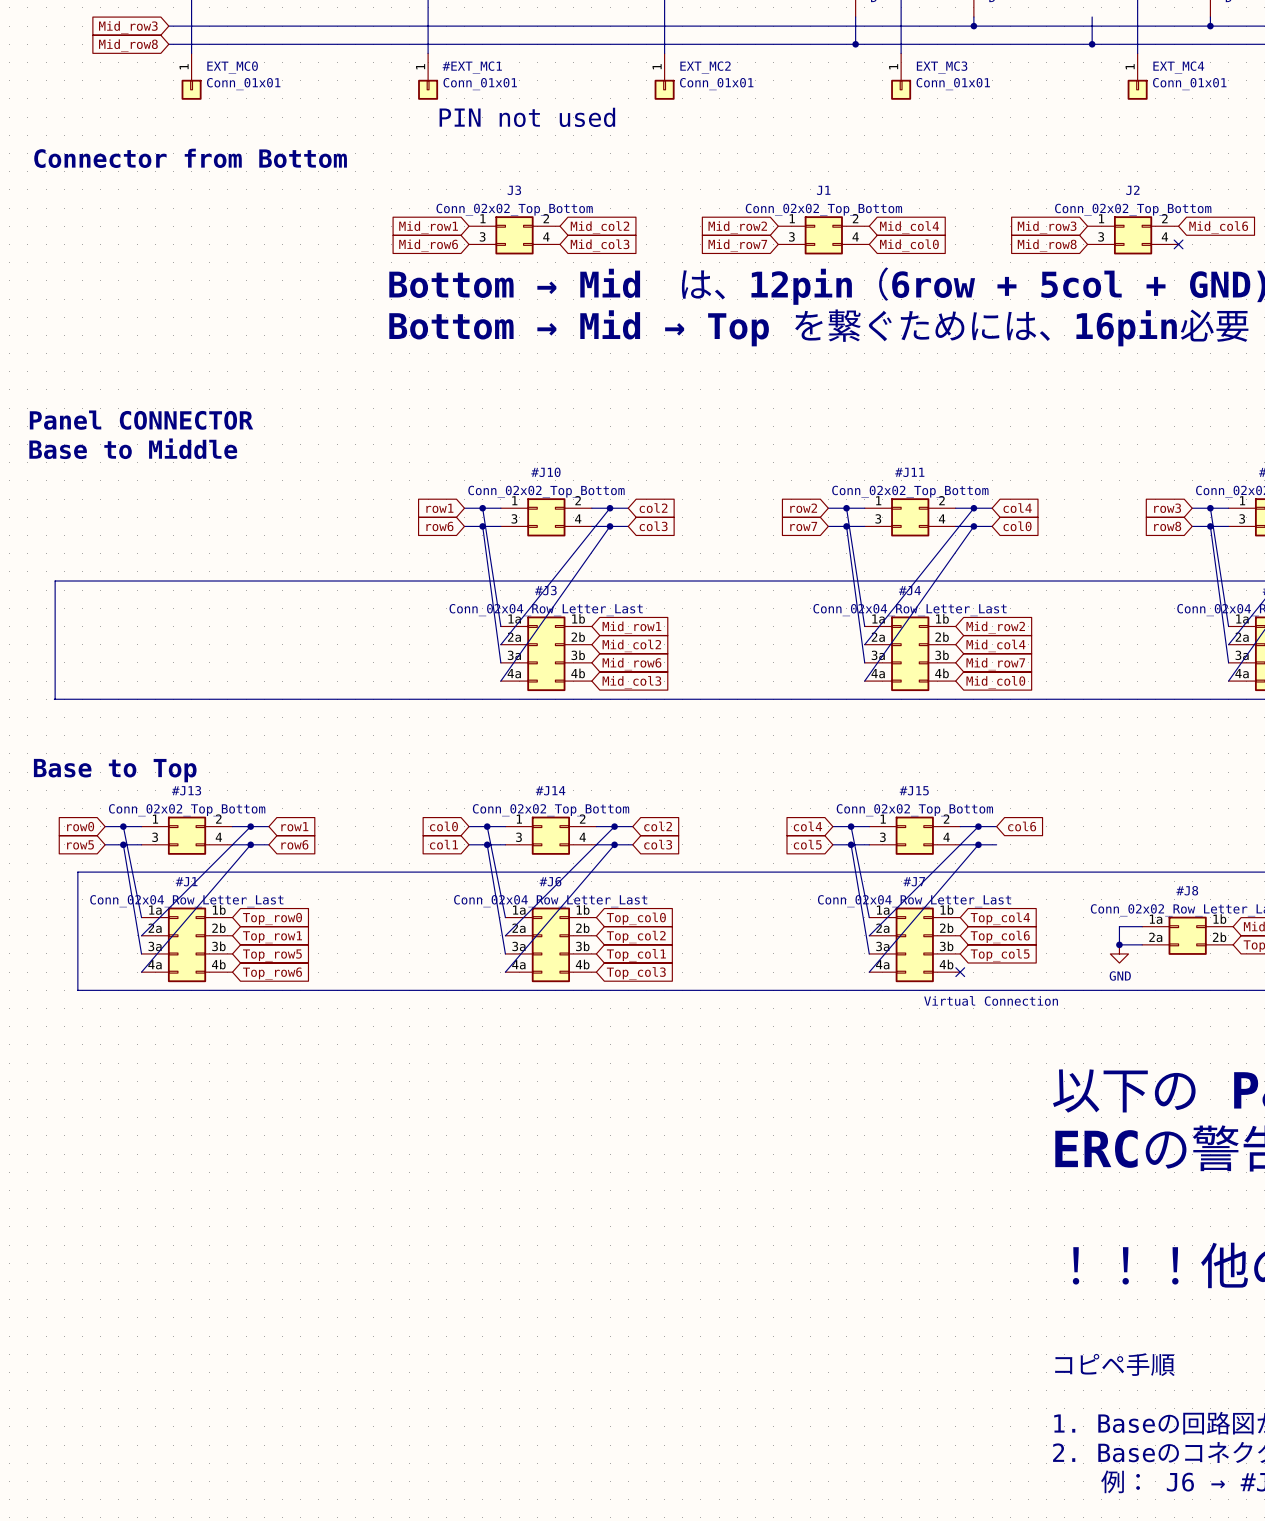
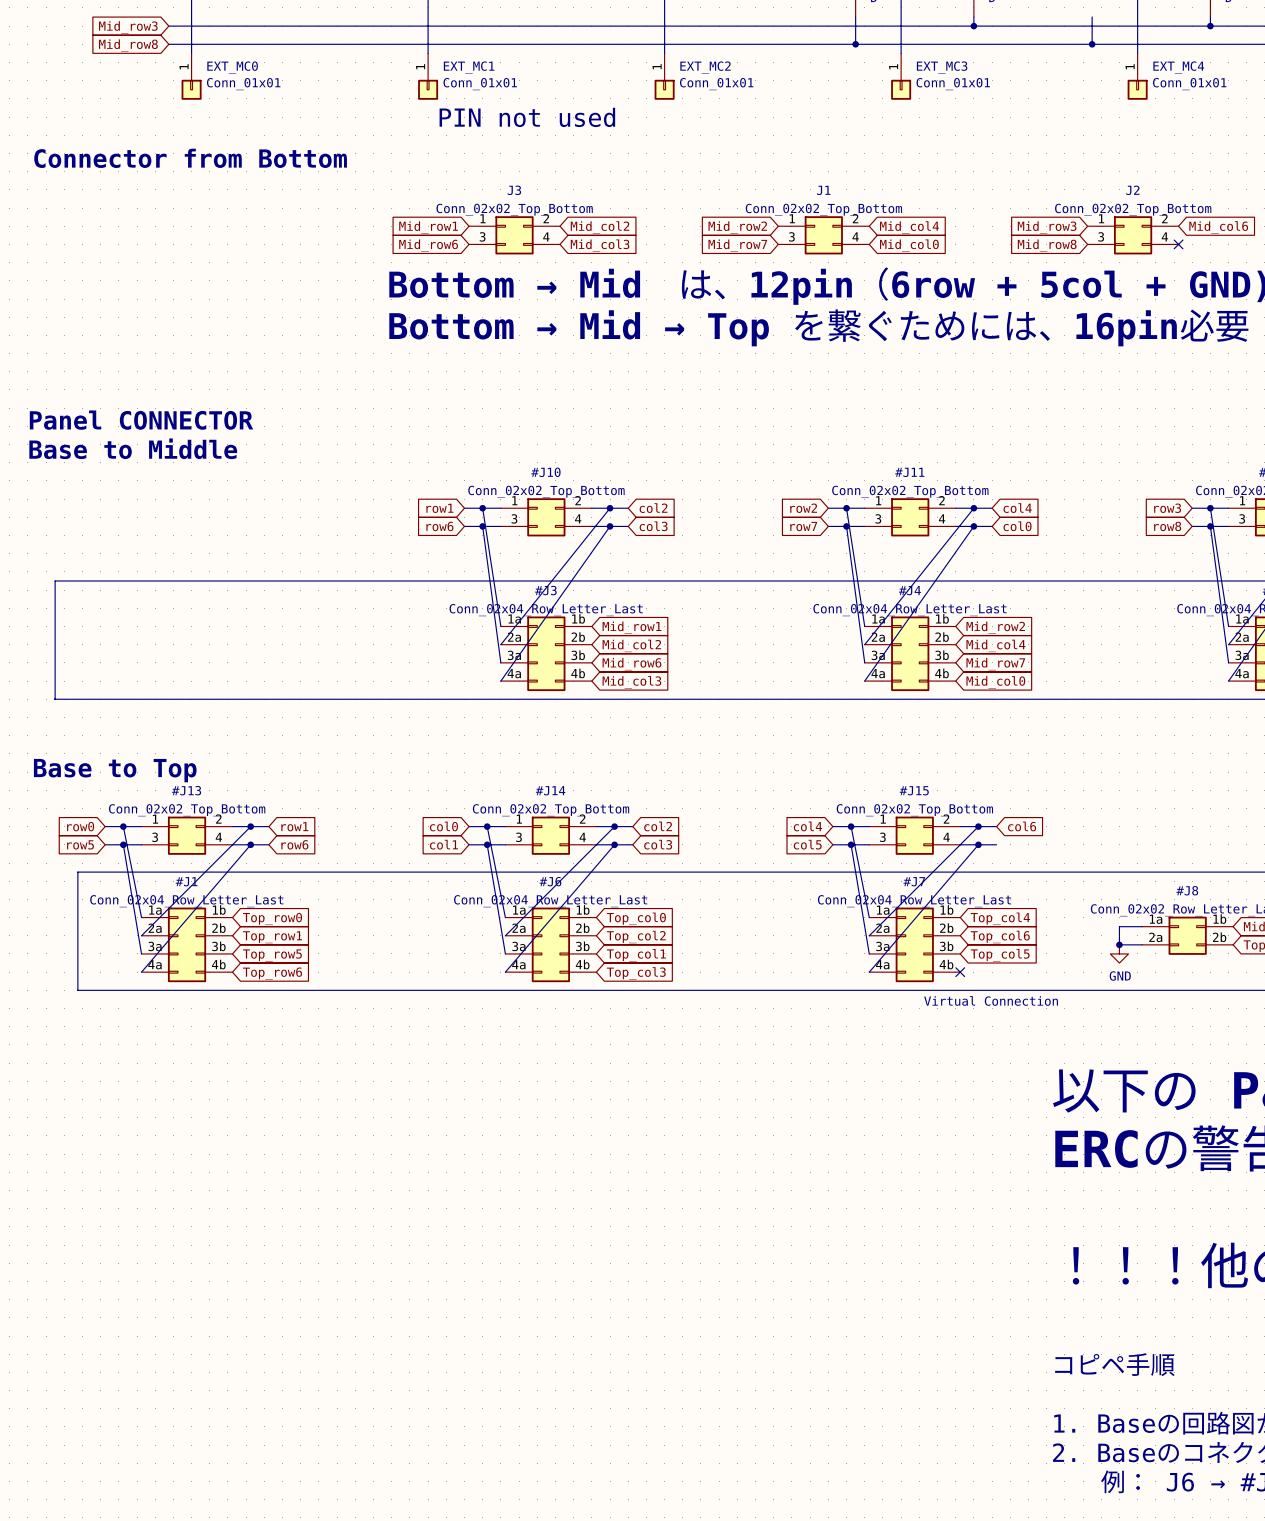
#EXT_MC1: Conn_01x01 (428, 76) -> none
EXT_MC1: none -> Conn_01x01 (428, 76)

